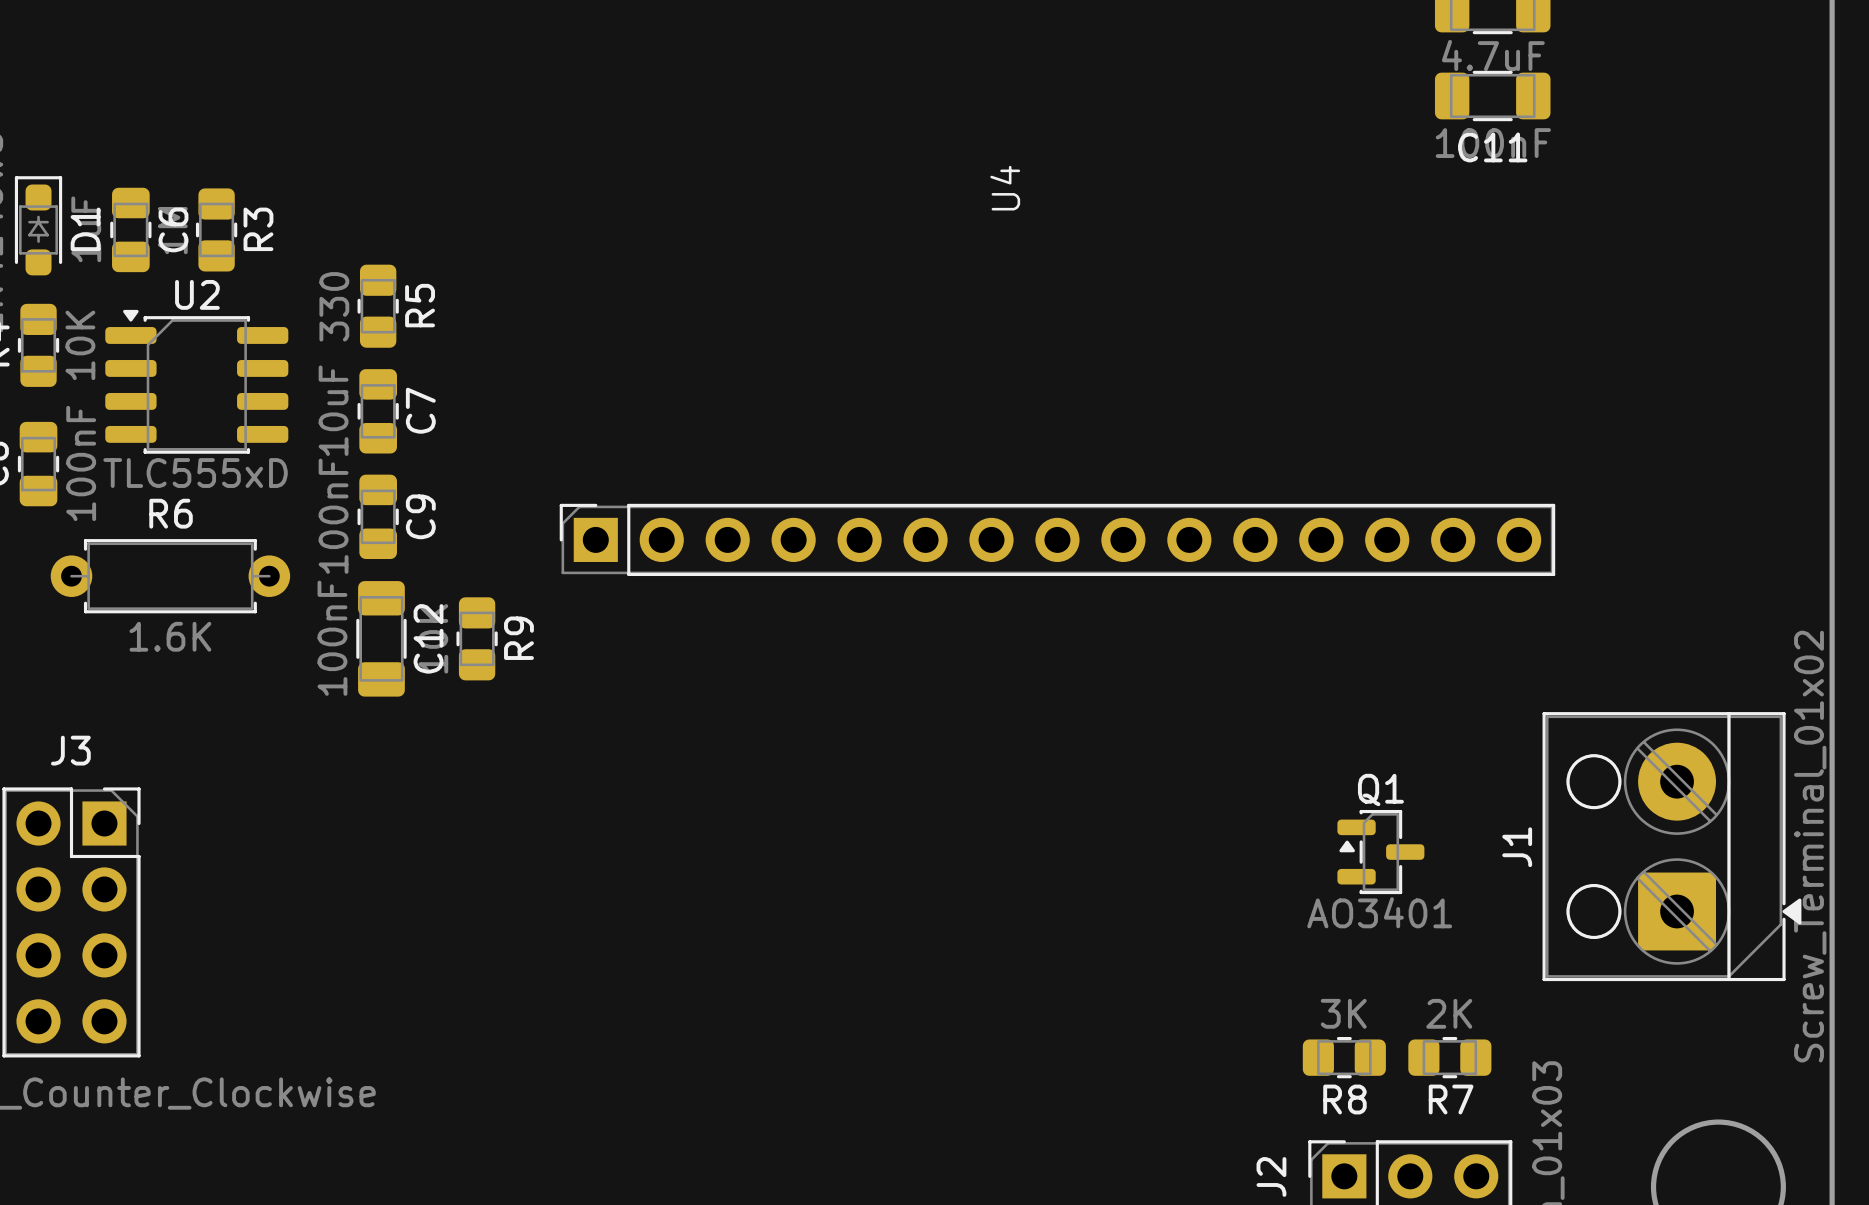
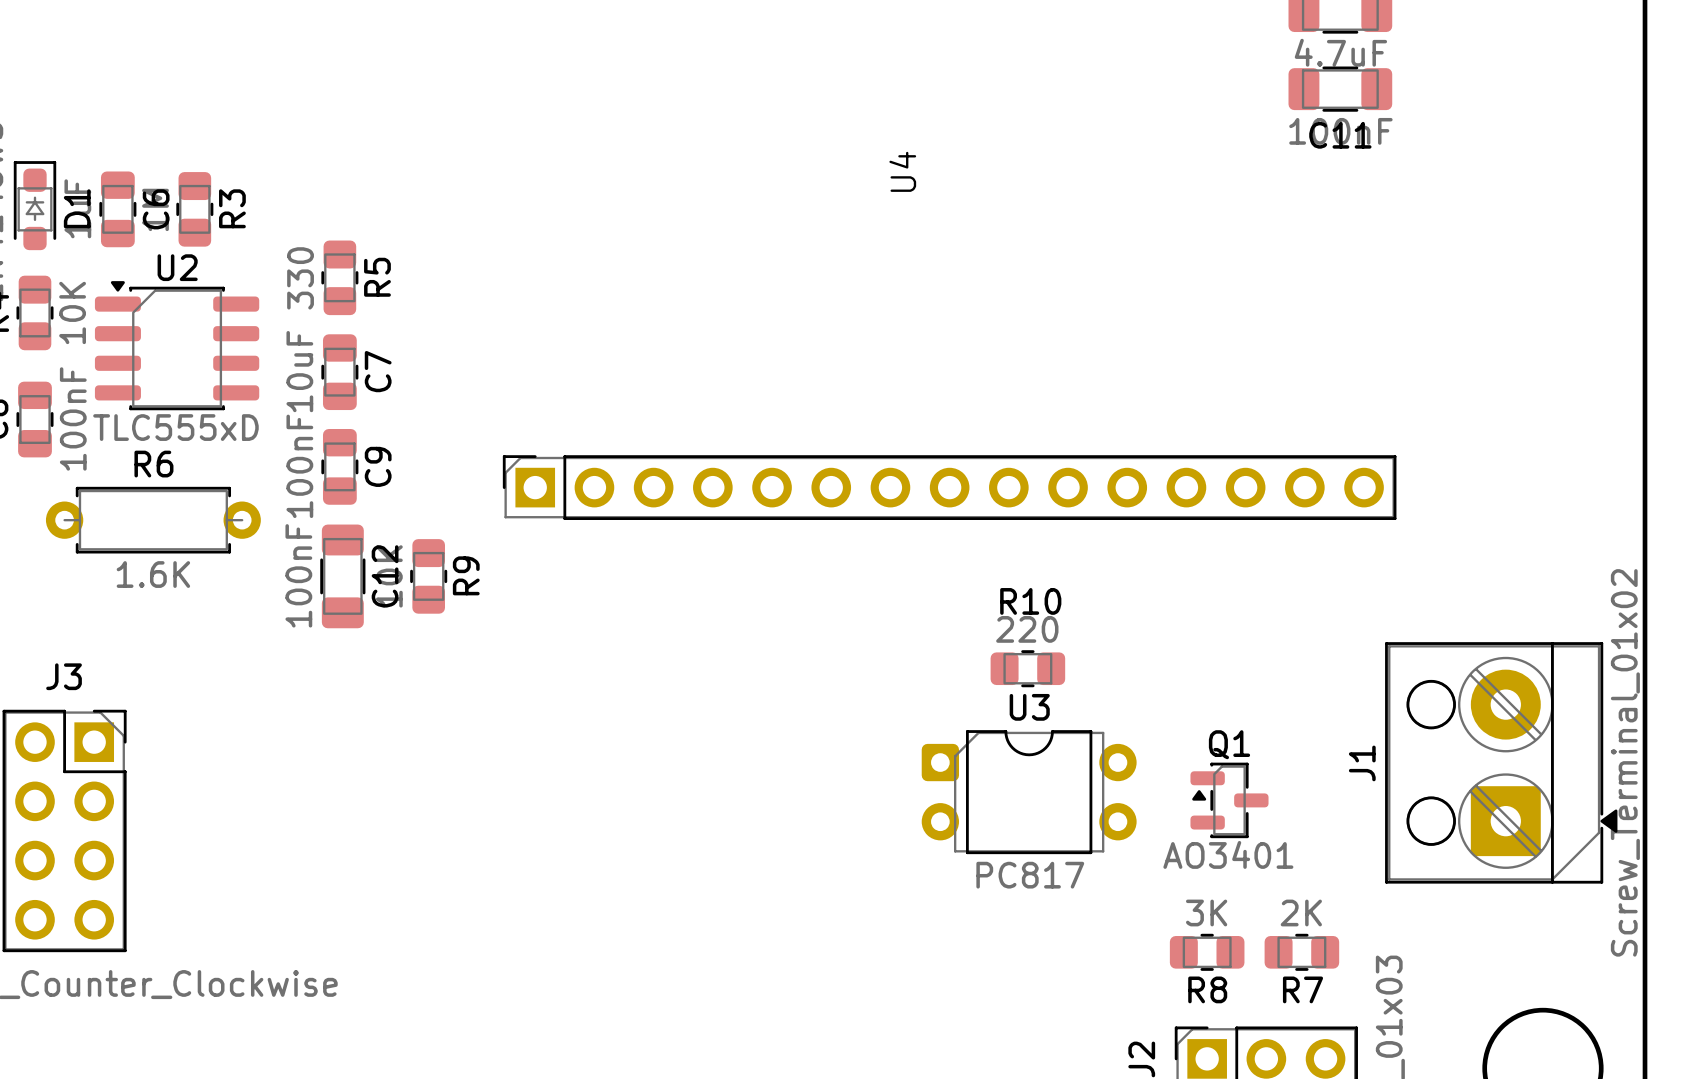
R10: none -> 220 (1027, 668)
Q1 position: (1380, 852) -> (1229, 800)
U3: none -> PC817 (1029, 792)

